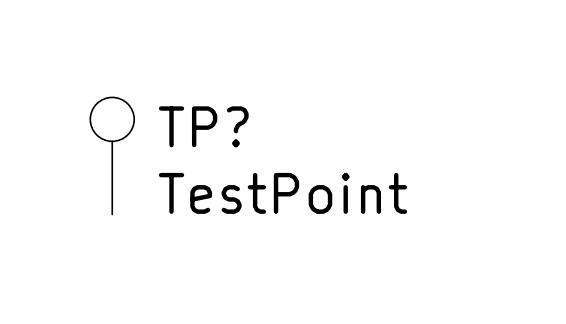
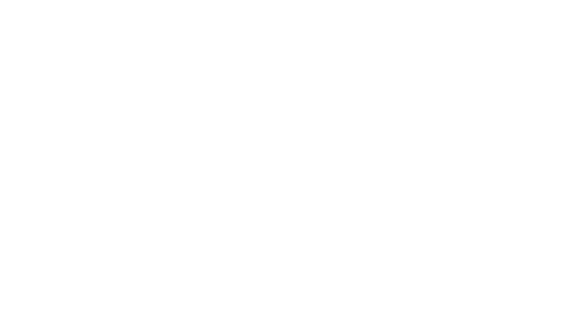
TP?: TestPoint (112, 155) -> none

